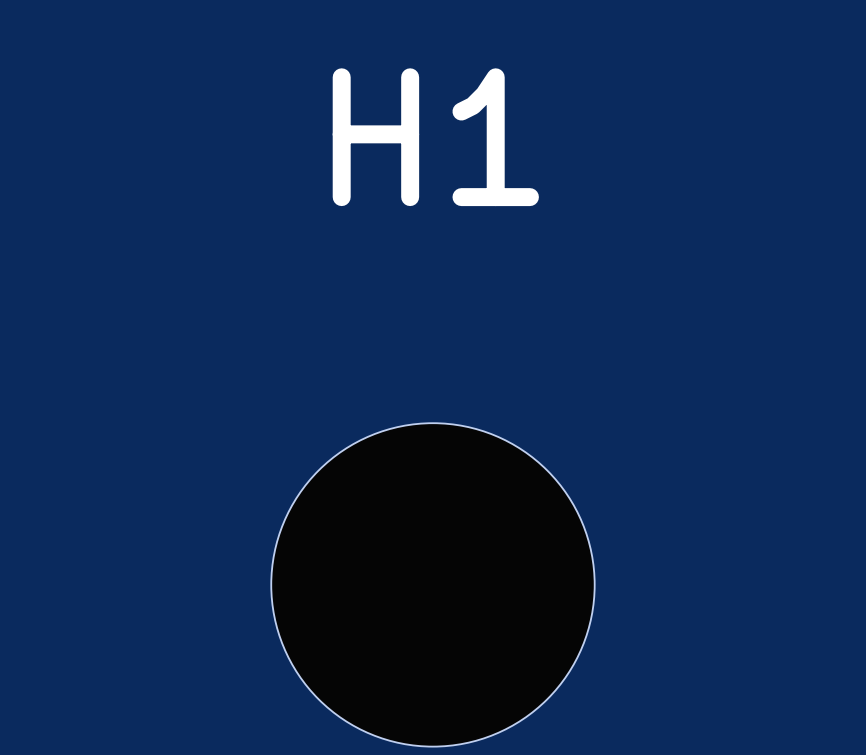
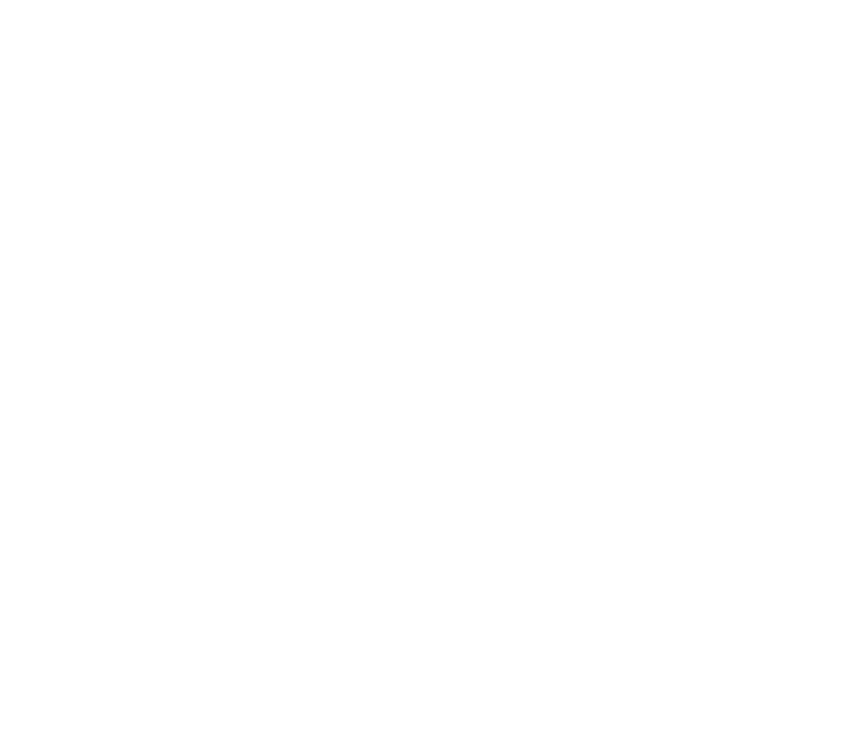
H1: (432, 584) -> none

